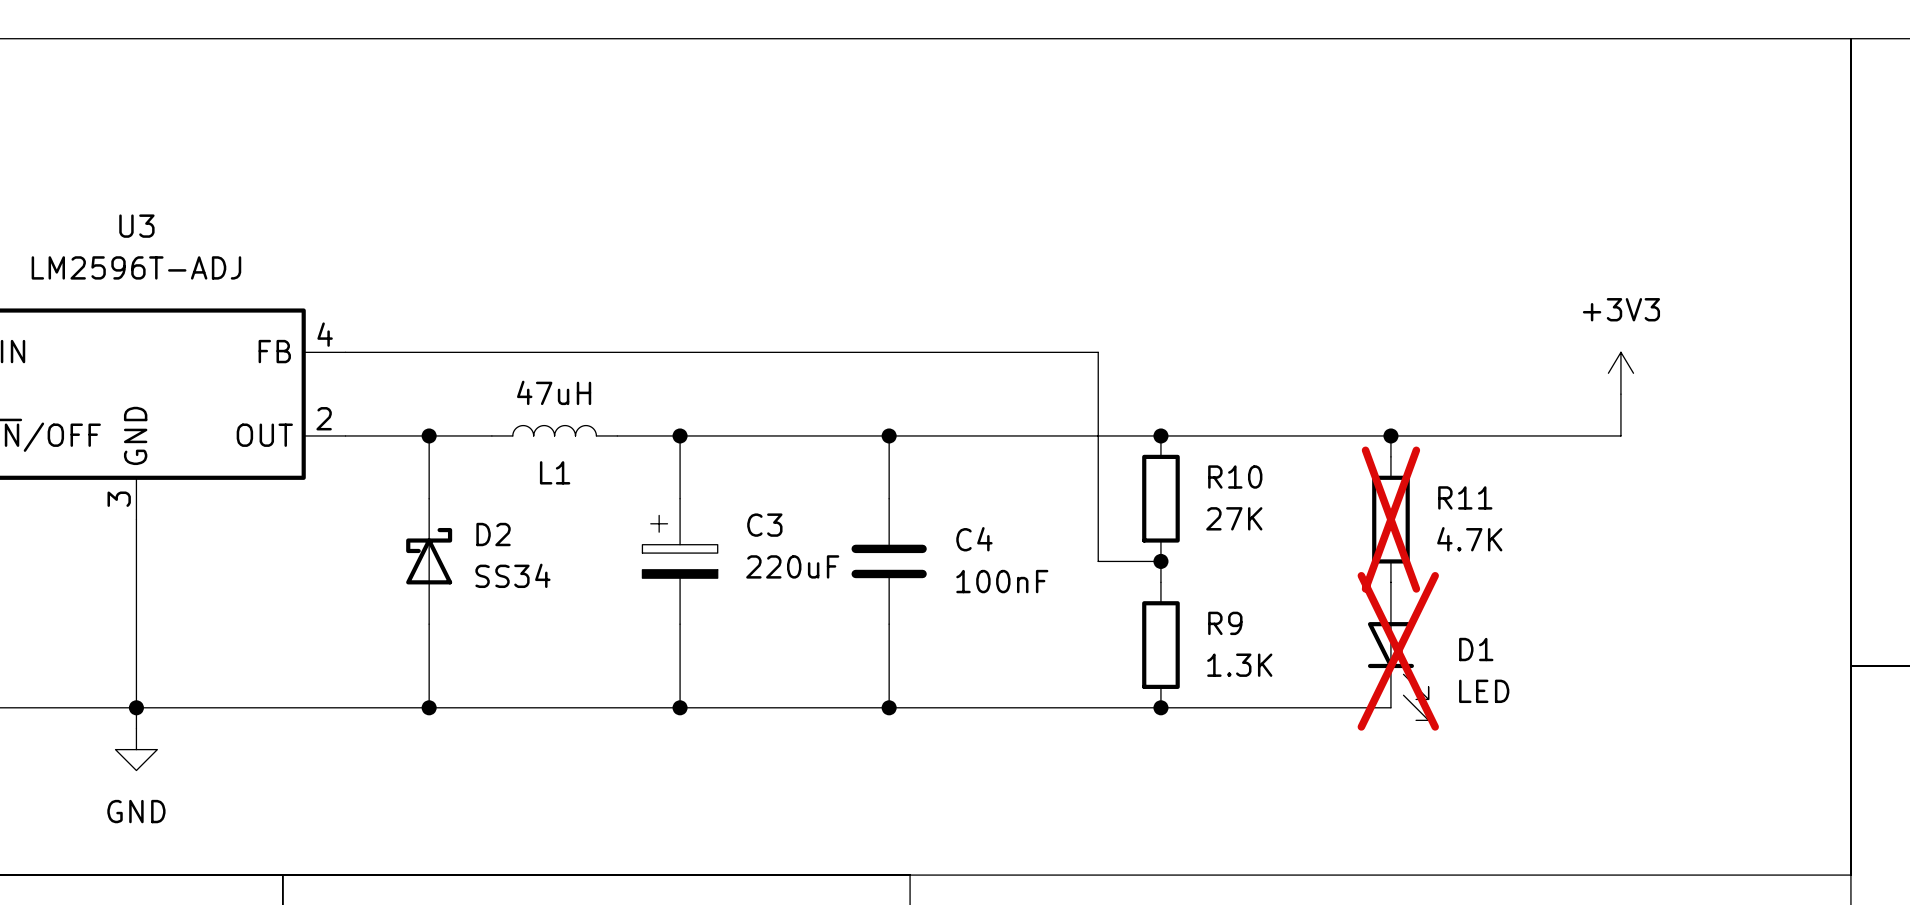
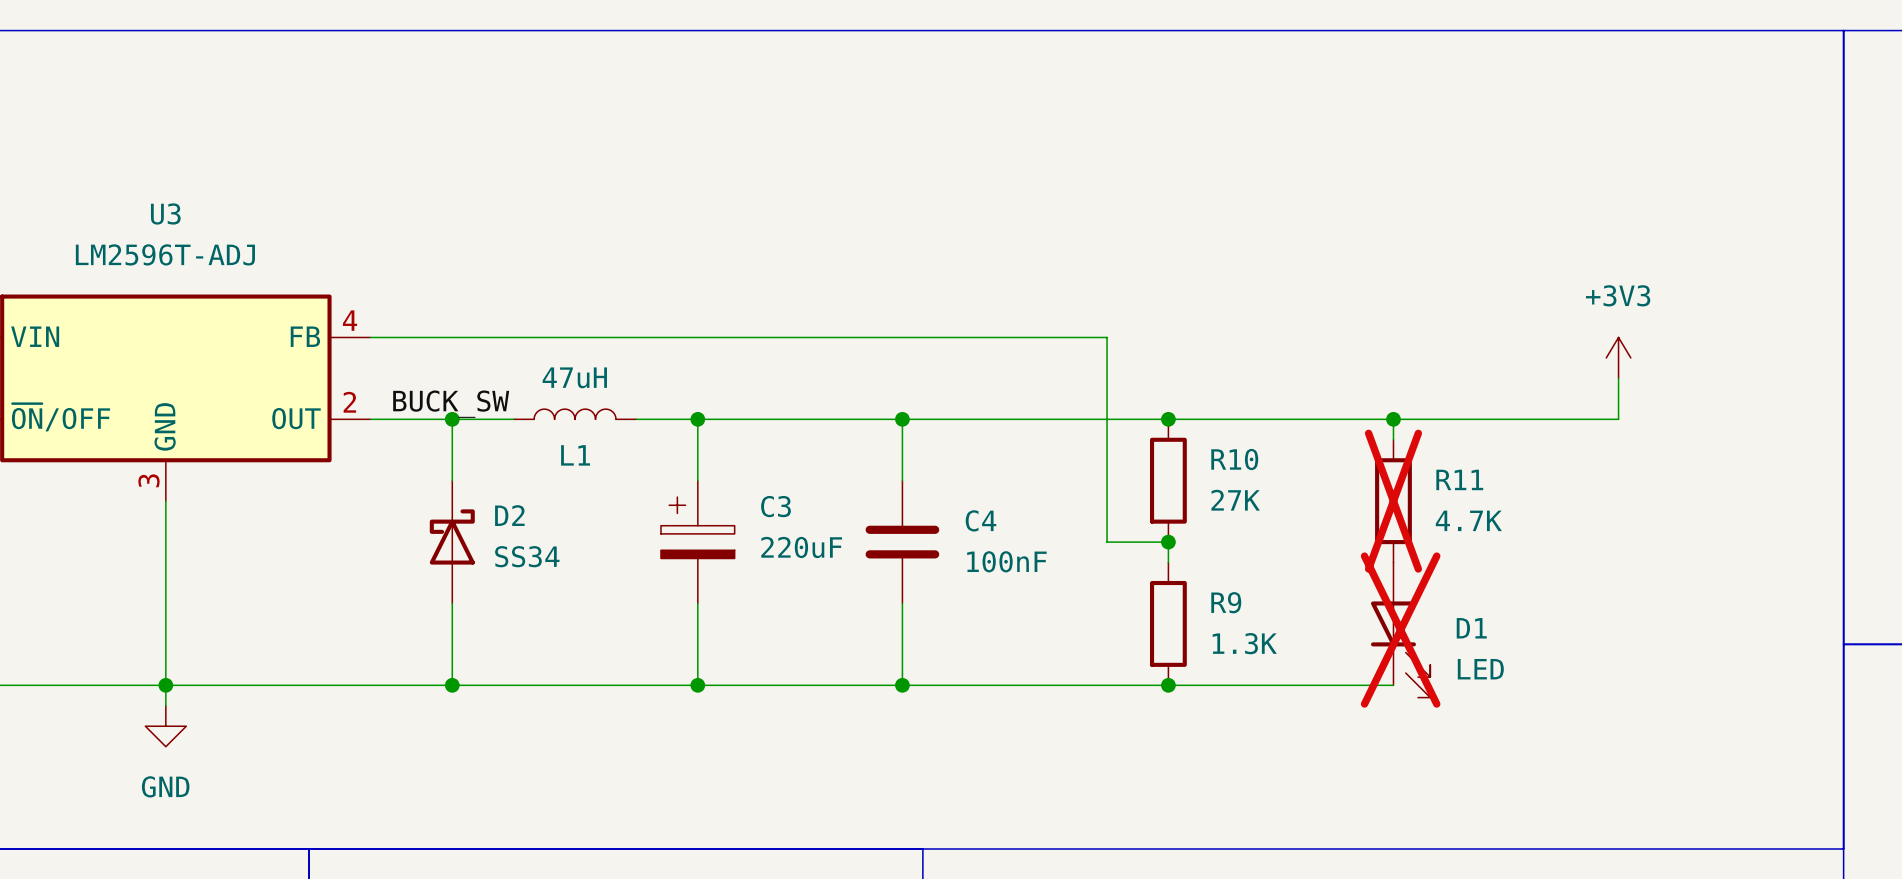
label: none -> BUCK_SW (451, 404)

